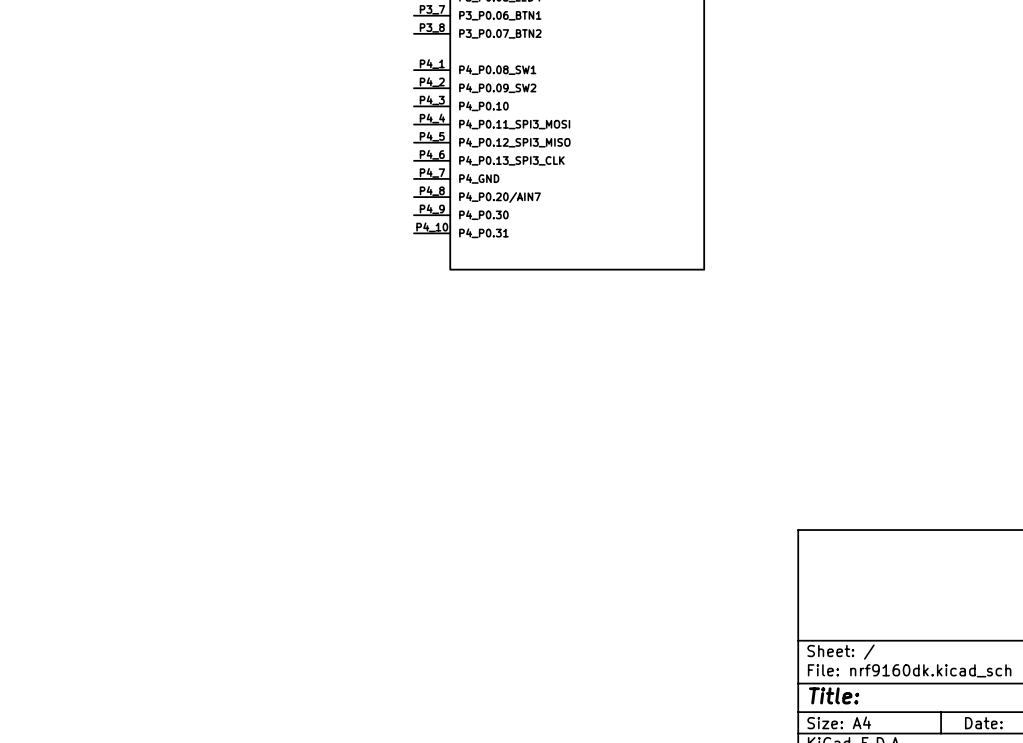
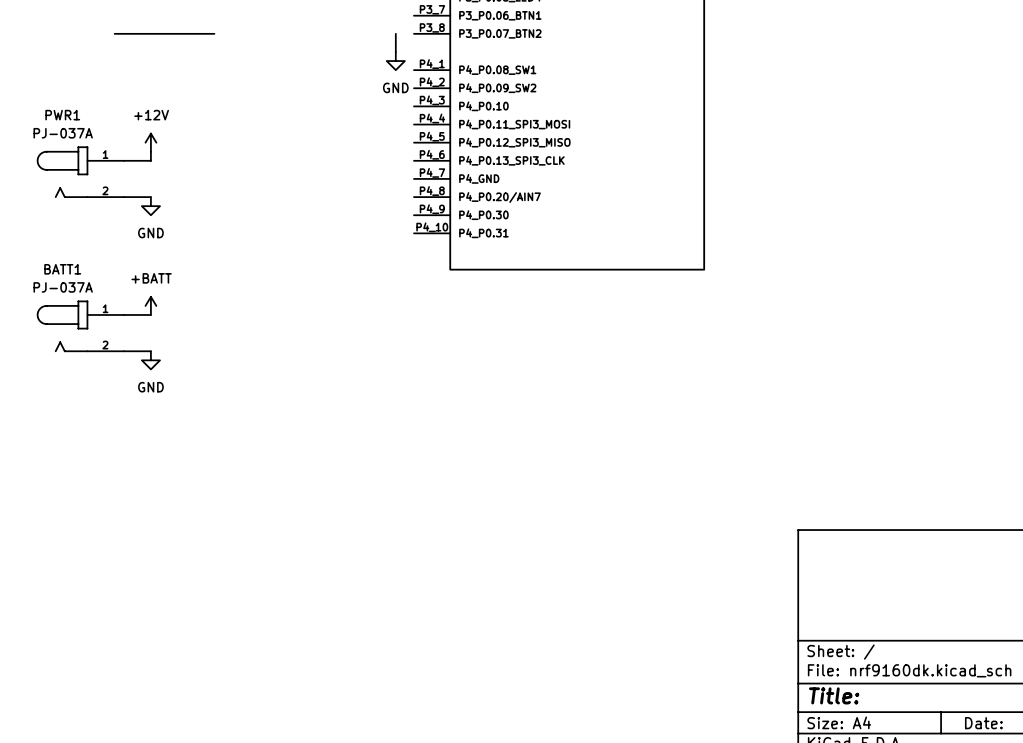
wire: none -> (114, 33) (214, 33)
wire: none -> (395, 33) (395, 51)
power symbol: none -> GND (395, 61)
power symbol: none -> +12V (150, 142)
wire: none -> (150, 151) (150, 160) (123, 160)
PWR1: none -> PJ-037A (80, 172)
wire: none -> (123, 197) (150, 197)
power symbol: none -> GND (150, 206)
power symbol: none -> +BATT (150, 305)
wire: none -> (123, 314) (150, 314)
BATT1: none -> PJ-037A (80, 326)
wire: none -> (123, 351) (150, 351)
power symbol: none -> GND (150, 360)

